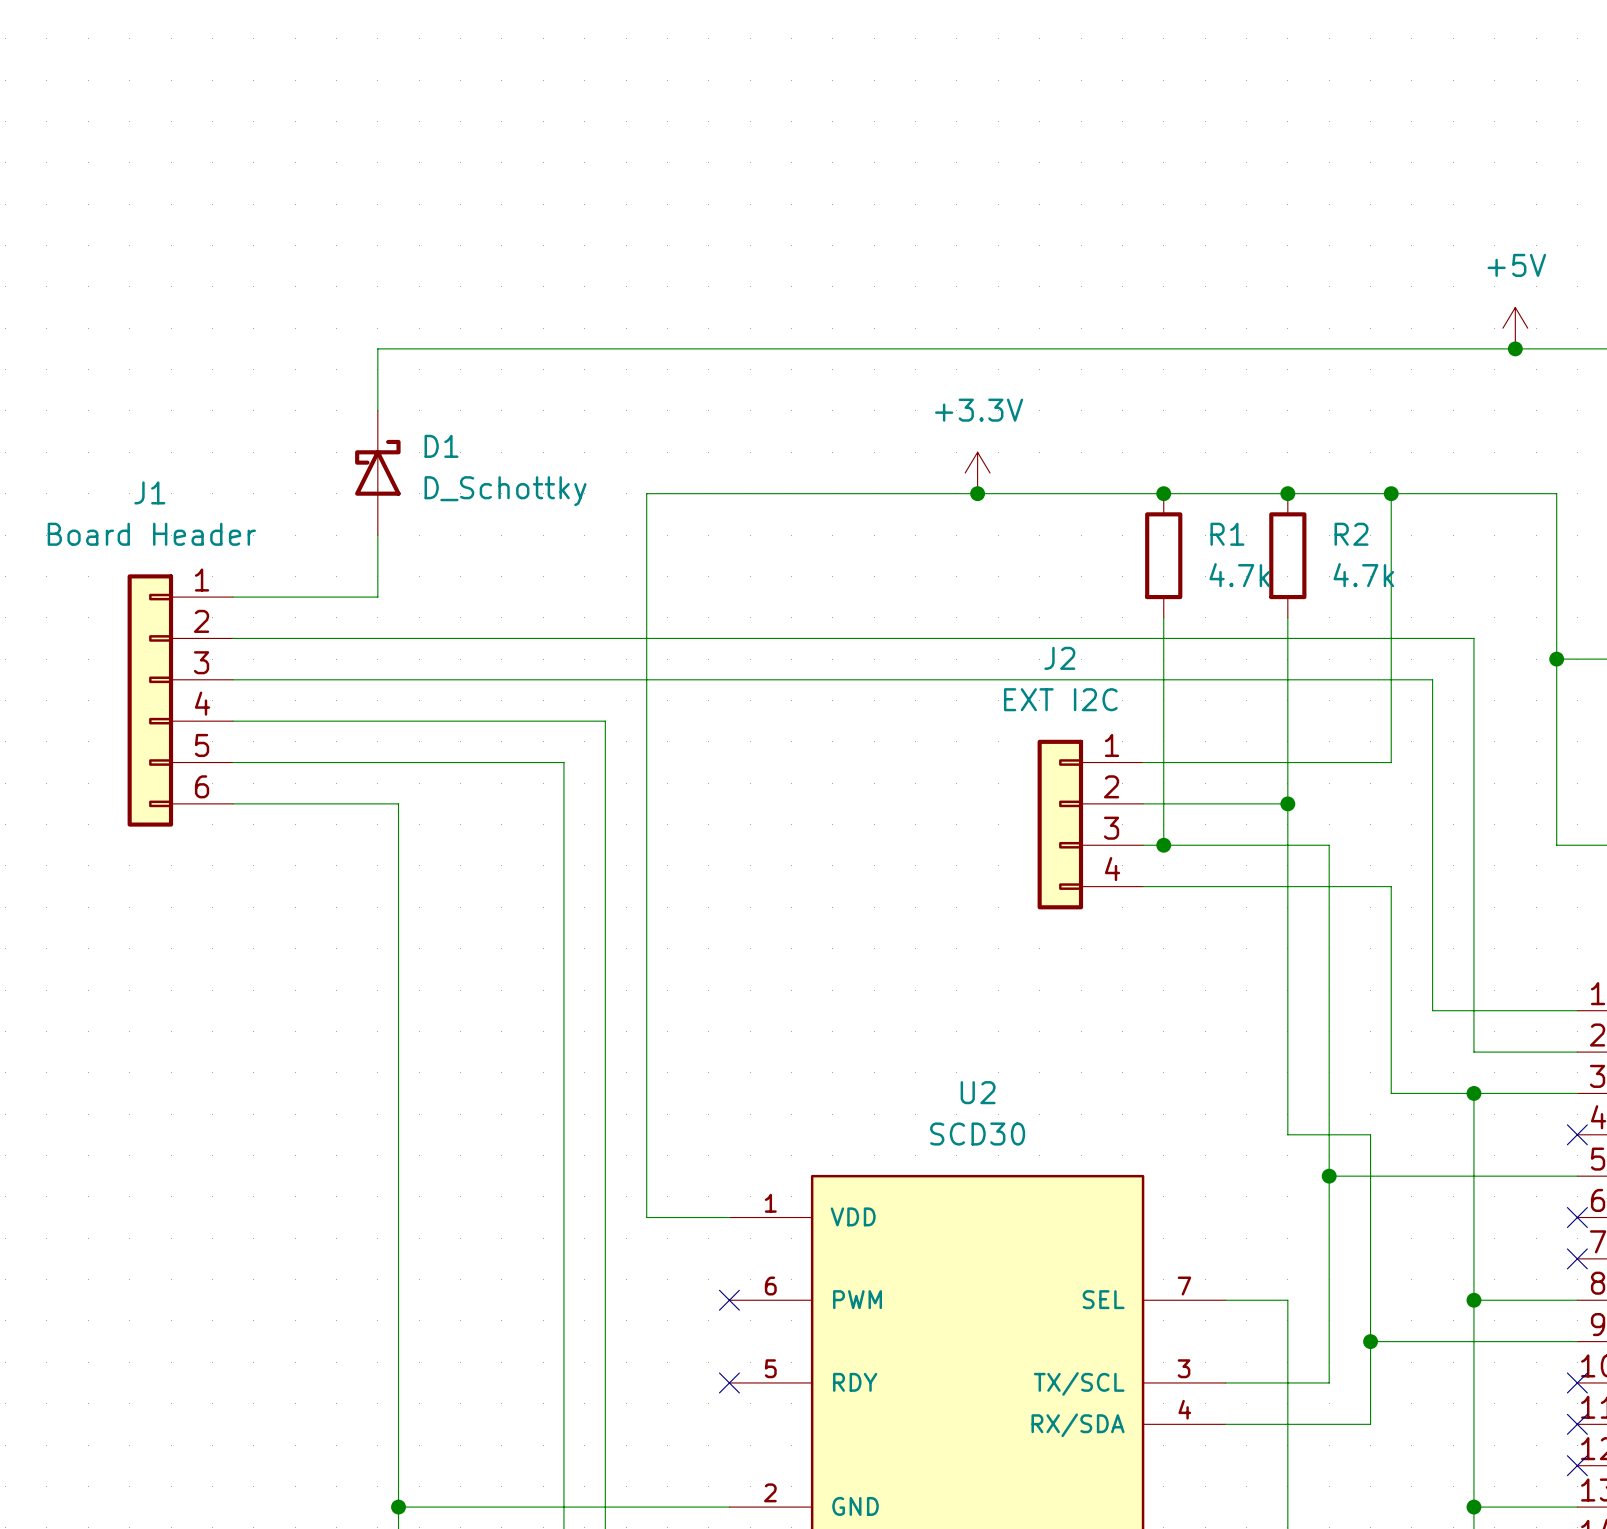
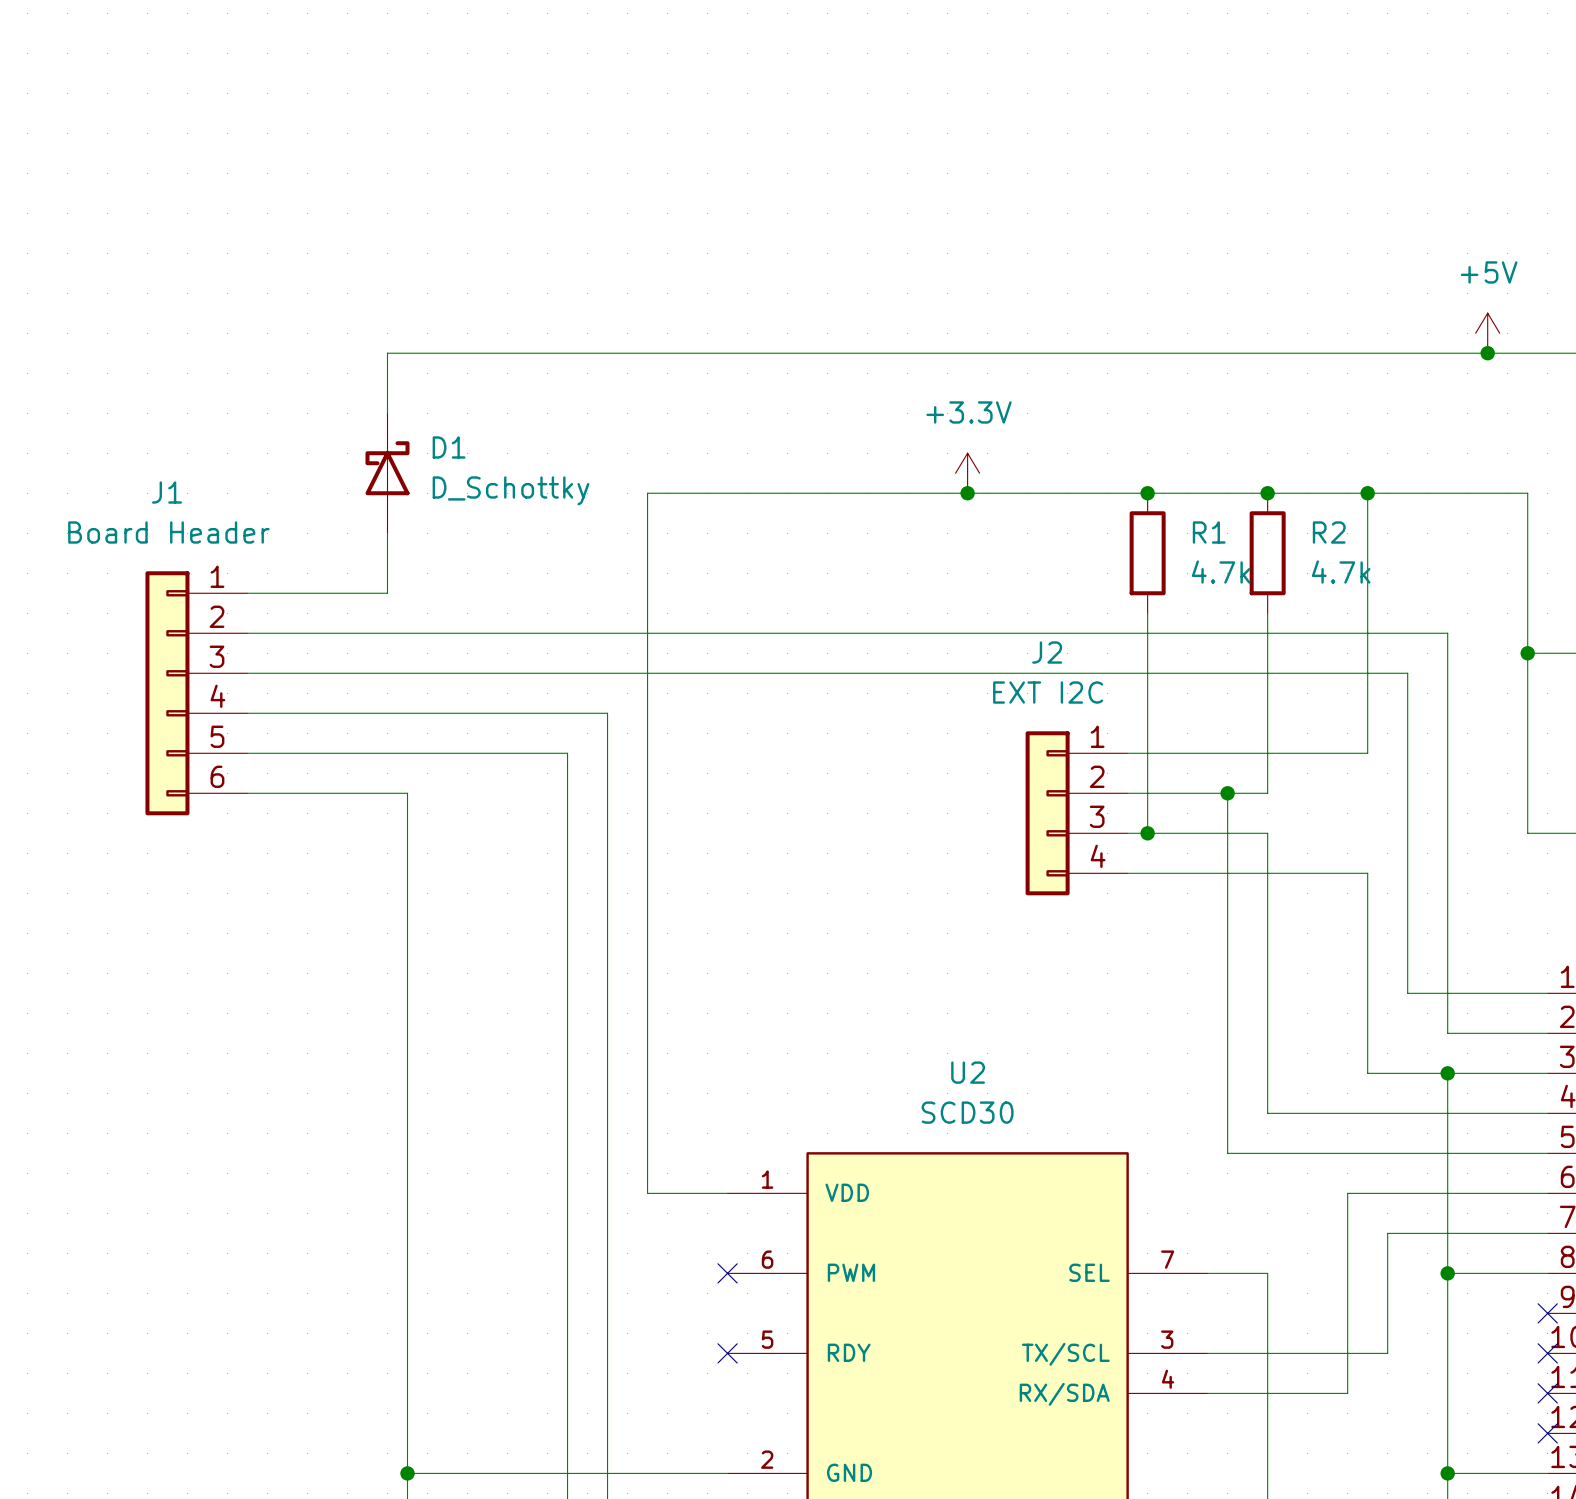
wire: none -> (1227, 793) (1227, 1153) (1307, 1153)
wire: (1287, 803) (1287, 845) (1329, 845) (1329, 1382) -> (1547, 1233) (1387, 1233) (1387, 1353) (1307, 1353)
junction position: (1287, 803) -> (1227, 793)
wire: (1370, 1134) (1370, 1217) -> (1347, 1113) (1547, 1113)
no-connect mark: (1577, 1134) -> none
junction: (1329, 1176) -> none
no-connect mark: (1577, 1217) -> none
no-connect mark: (1577, 1258) -> none
wire: (1370, 1341) (1577, 1341) -> (1347, 1193) (1547, 1193)
junction: (1370, 1341) -> none
no-connect mark: none -> (1547, 1313)

